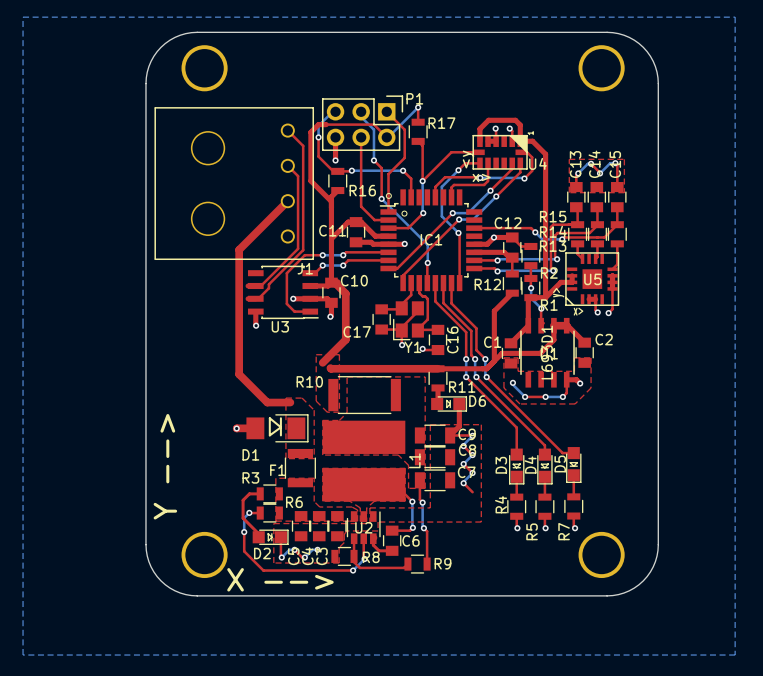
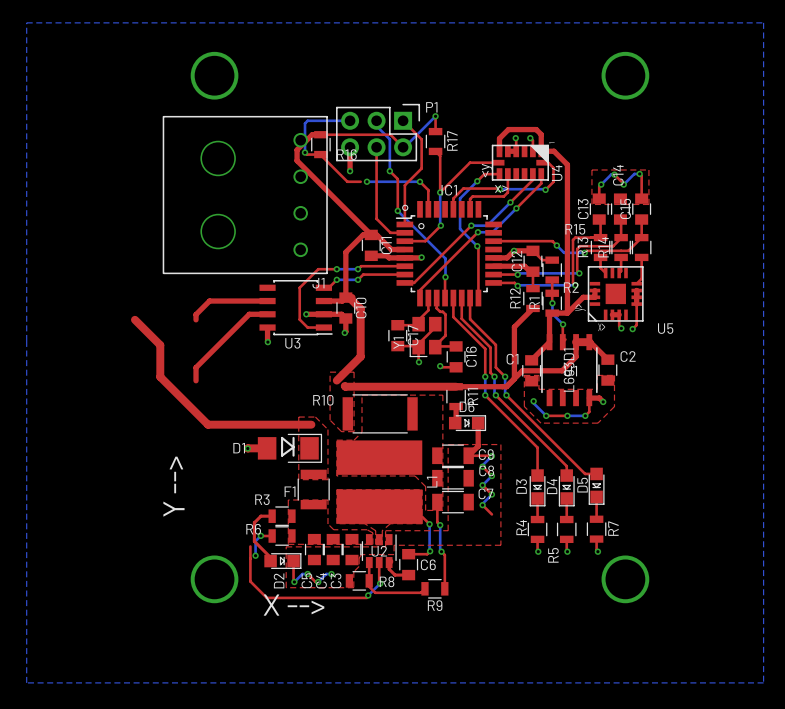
board edge: (197, 32) (607, 32) (629, 37) (647, 51) (655, 66) (658, 83) (658, 544) (653, 566) (639, 584) (624, 593) (607, 595) (197, 595) (174, 590) (157, 576) (148, 561) (145, 544) (146, 77) (151, 61) (160, 47) (180, 35) (197, 32) -> none
bottom track: (332, 111) (318, 125) (318, 137) -> (347, 120) (307, 120) (305, 123) (305, 152)
R17 name rotation: 0° (441, 123) -> 90° counterclockwise (452, 140)
top track: (324, 124) (374, 125) -> (371, 234) (297, 160) (297, 149) (312, 134) (390, 134)
top track: (326, 124) (318, 124) (310, 132) (310, 180) (331, 201) -> none
top track: (287, 130) (303, 145) (303, 250) (268, 284) (268, 288) (258, 298) (255, 298) -> none
top track: (318, 137) (318, 156) (333, 171) (351, 170) -> none
via position: (318, 137) -> (305, 152)
top track: none -> (305, 152) (306, 154) (320, 154) (347, 181) (360, 181)
U4 name rotation: 0° (538, 163) -> 90° counterclockwise (557, 173)
C13 name position: C13 (575, 164) -> C13 (583, 209)
C15 name position: C15 (615, 164) -> C15 (625, 208)
top track: (287, 165) (298, 176) (298, 248) (260, 285) (255, 285) -> none
R16 position: (337, 180) -> (320, 144)
top track: (337, 190) (331, 196) (331, 238) -> none
top track: (287, 201) (239, 249) (239, 374) (267, 402) (290, 402) -> none
C12 name rotation: 0° (508, 223) -> 90° counterclockwise (516, 261)
C11 name rotation: 0° (332, 230) -> 90° counterclockwise (386, 245)
C11 name position: C11 (332, 230) -> C11 (386, 245)
R14 name rotation: 0° (553, 231) -> 90° counterclockwise (603, 247)
IC1 name position: IC1 (431, 239) -> IC1 (449, 190)
R13 name rotation: 0° (553, 246) -> 90° counterclockwise (583, 247)
U5 name position: U5 (592, 279) -> U5 (665, 328)
C10 name rotation: 0° (354, 280) -> 90° counterclockwise (361, 308)
R12 name rotation: 0° (487, 284) -> 90° counterclockwise (515, 298)
top track: none -> (259, 301) (209, 301) (196, 314) (196, 319)
top track: none -> (259, 314) (249, 314) (196, 367) (196, 380)
top track: none -> (134, 319) (160, 345) (160, 376) (208, 424) (311, 424)
R1 name rotation: 0° (549, 305) -> 90° counterclockwise (534, 303)
R1 name position: R1 (549, 305) -> R1 (534, 303)
C17 name rotation: 0° (357, 331) -> 90° counterclockwise (413, 335)
C17 name position: C17 (357, 331) -> C17 (413, 335)
Y1 name rotation: 0° (412, 347) -> 90° counterclockwise (398, 343)
Y1 name position: Y1 (412, 347) -> Y1 (398, 343)
R11 name rotation: 0° (462, 387) -> 90° counterclockwise (472, 396)
D6 name position: D6 (477, 401) -> D6 (467, 406)
D1 name position: D1 (250, 454) -> D1 (239, 448)
R6 name position: R6 (294, 502) -> R6 (253, 529)
top track: none -> (250, 546) (250, 581) (266, 597) (367, 597)
R7 name position: R7 (564, 531) -> R7 (613, 528)
top track: (244, 532) (244, 551) (263, 570) (353, 570) -> none
D2 name rotation: 0° (262, 553) -> 90° counterclockwise (279, 580)
R9 name position: R9 (442, 563) -> R9 (435, 605)

